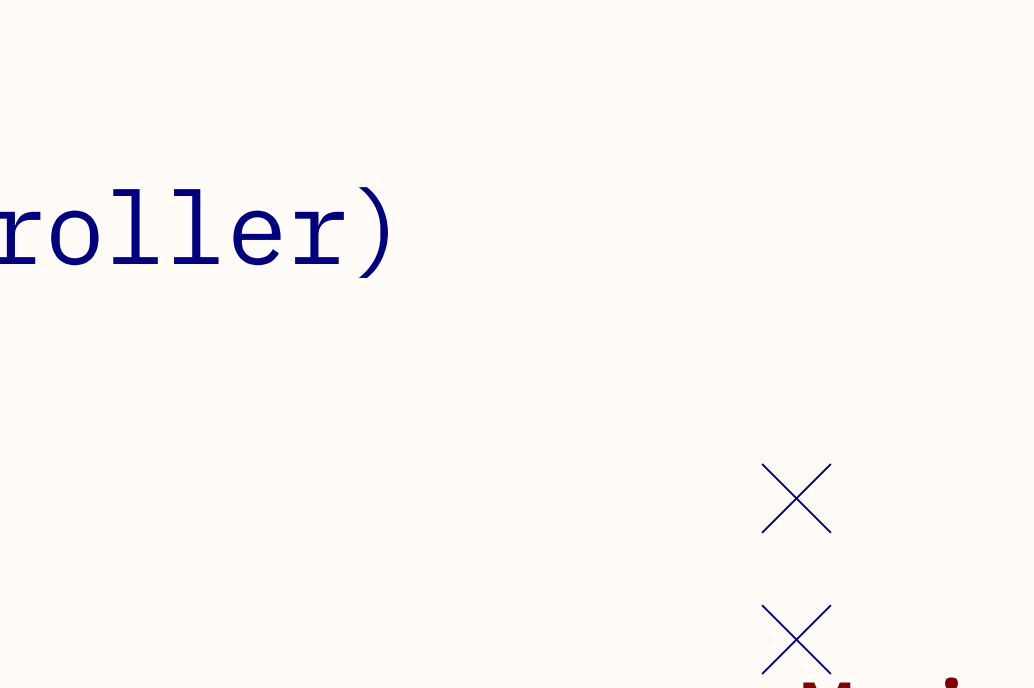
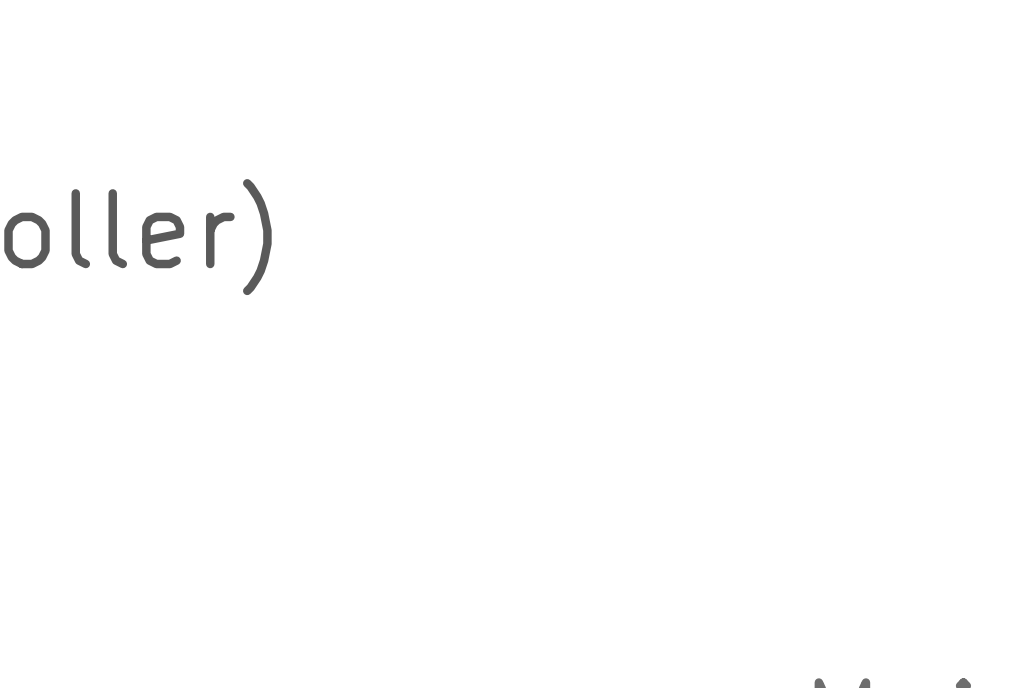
no-connect mark: (796, 498) -> none
no-connect mark: (796, 639) -> none

